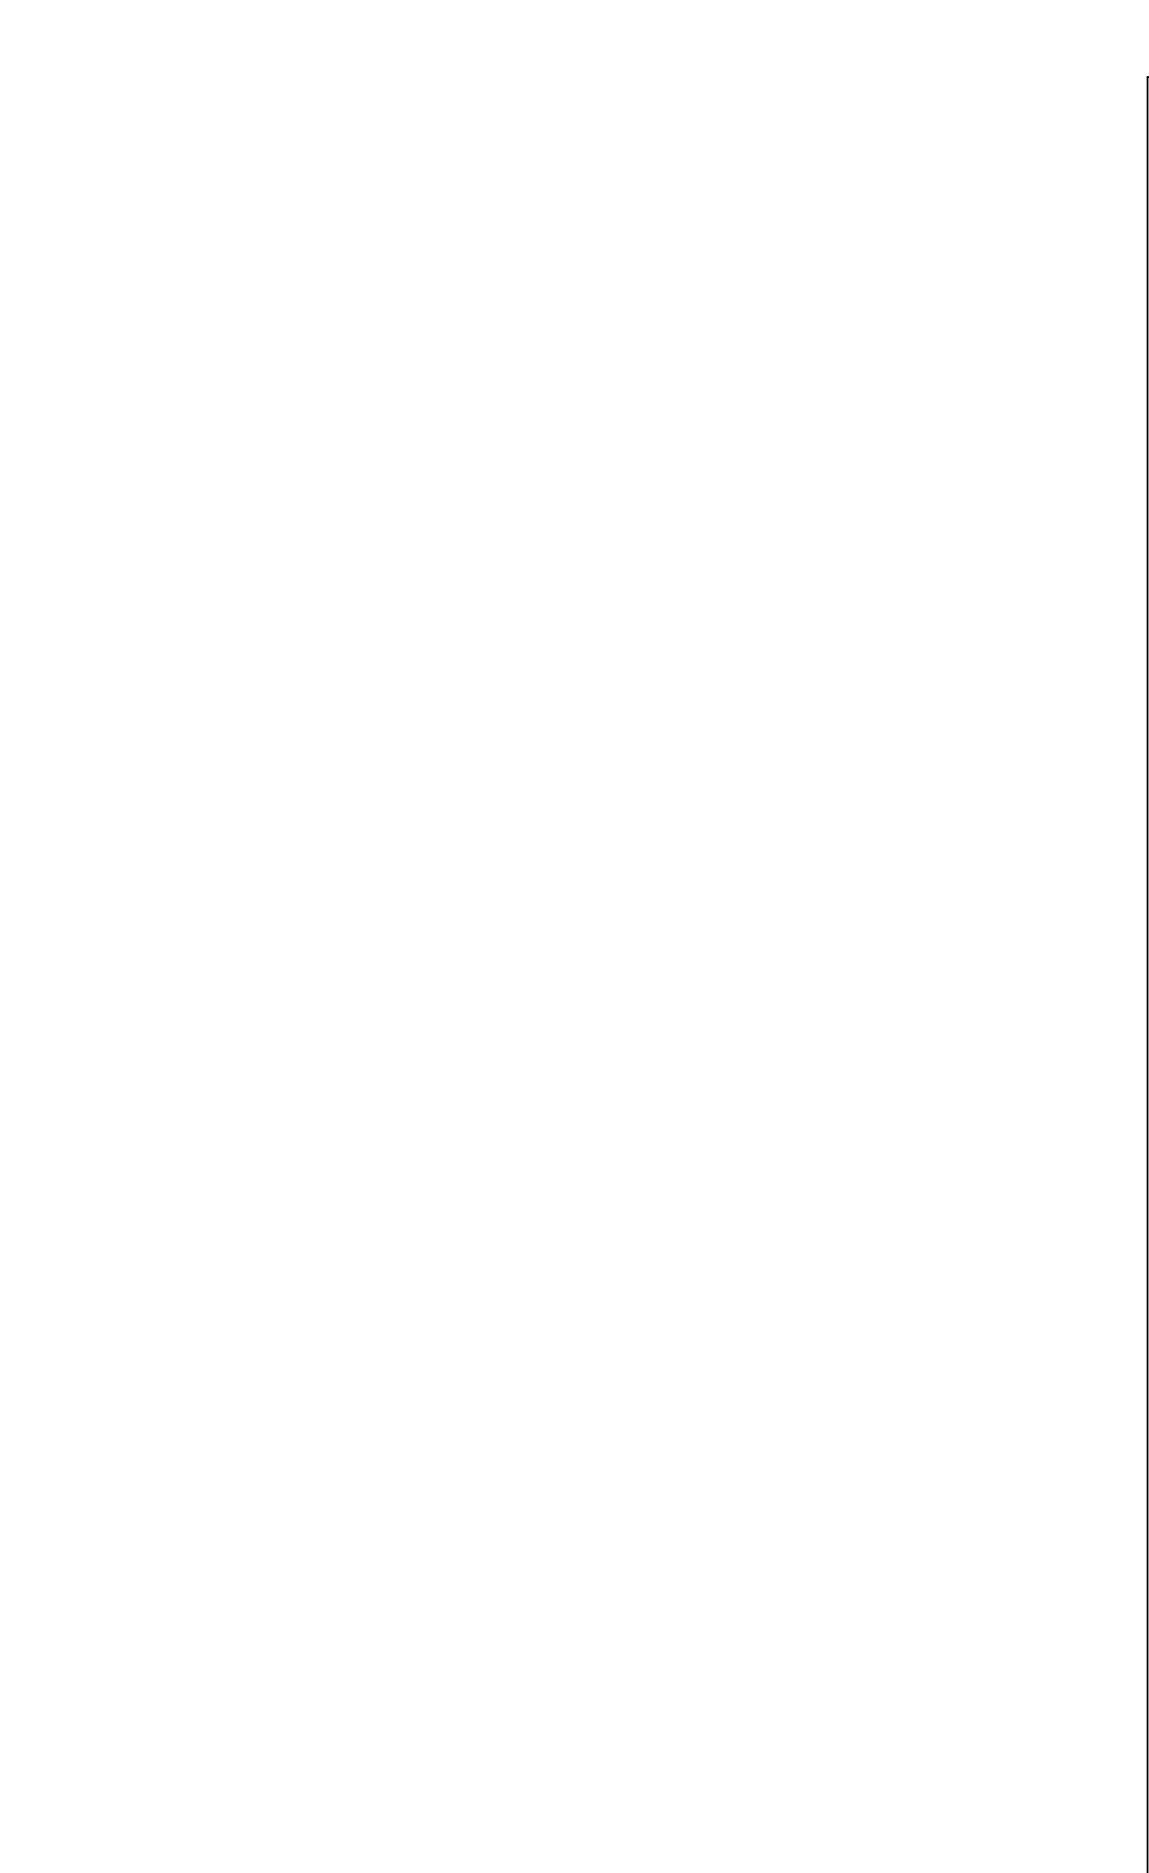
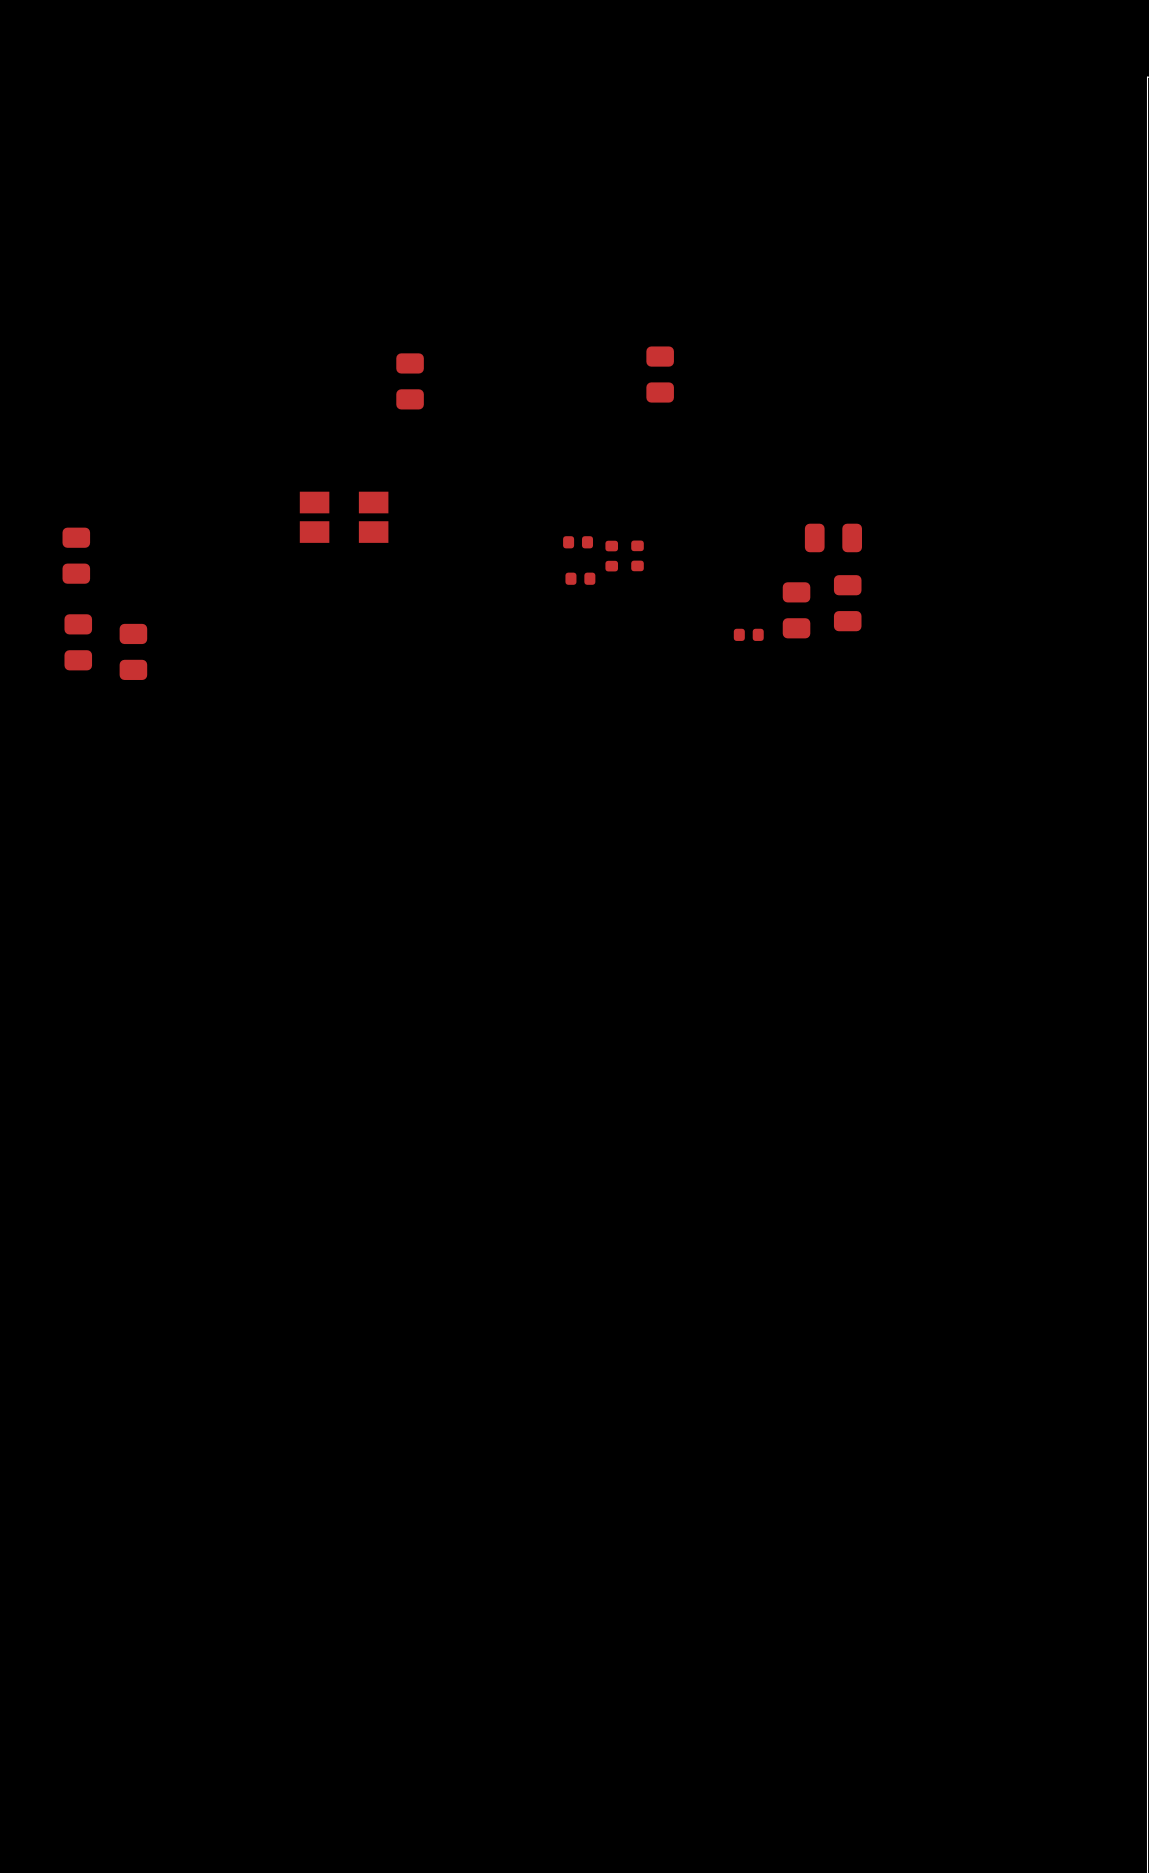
part: none -> (660, 374)
part: none -> (410, 381)
part: none -> (344, 517)
part: none -> (833, 537)
part: none -> (578, 542)
part: none -> (76, 555)
part: none -> (637, 555)
part: none -> (611, 556)
part: none -> (580, 578)
part: none -> (847, 603)
part: none -> (796, 610)
part: none -> (748, 634)
part: none -> (78, 642)
part: none -> (133, 651)

